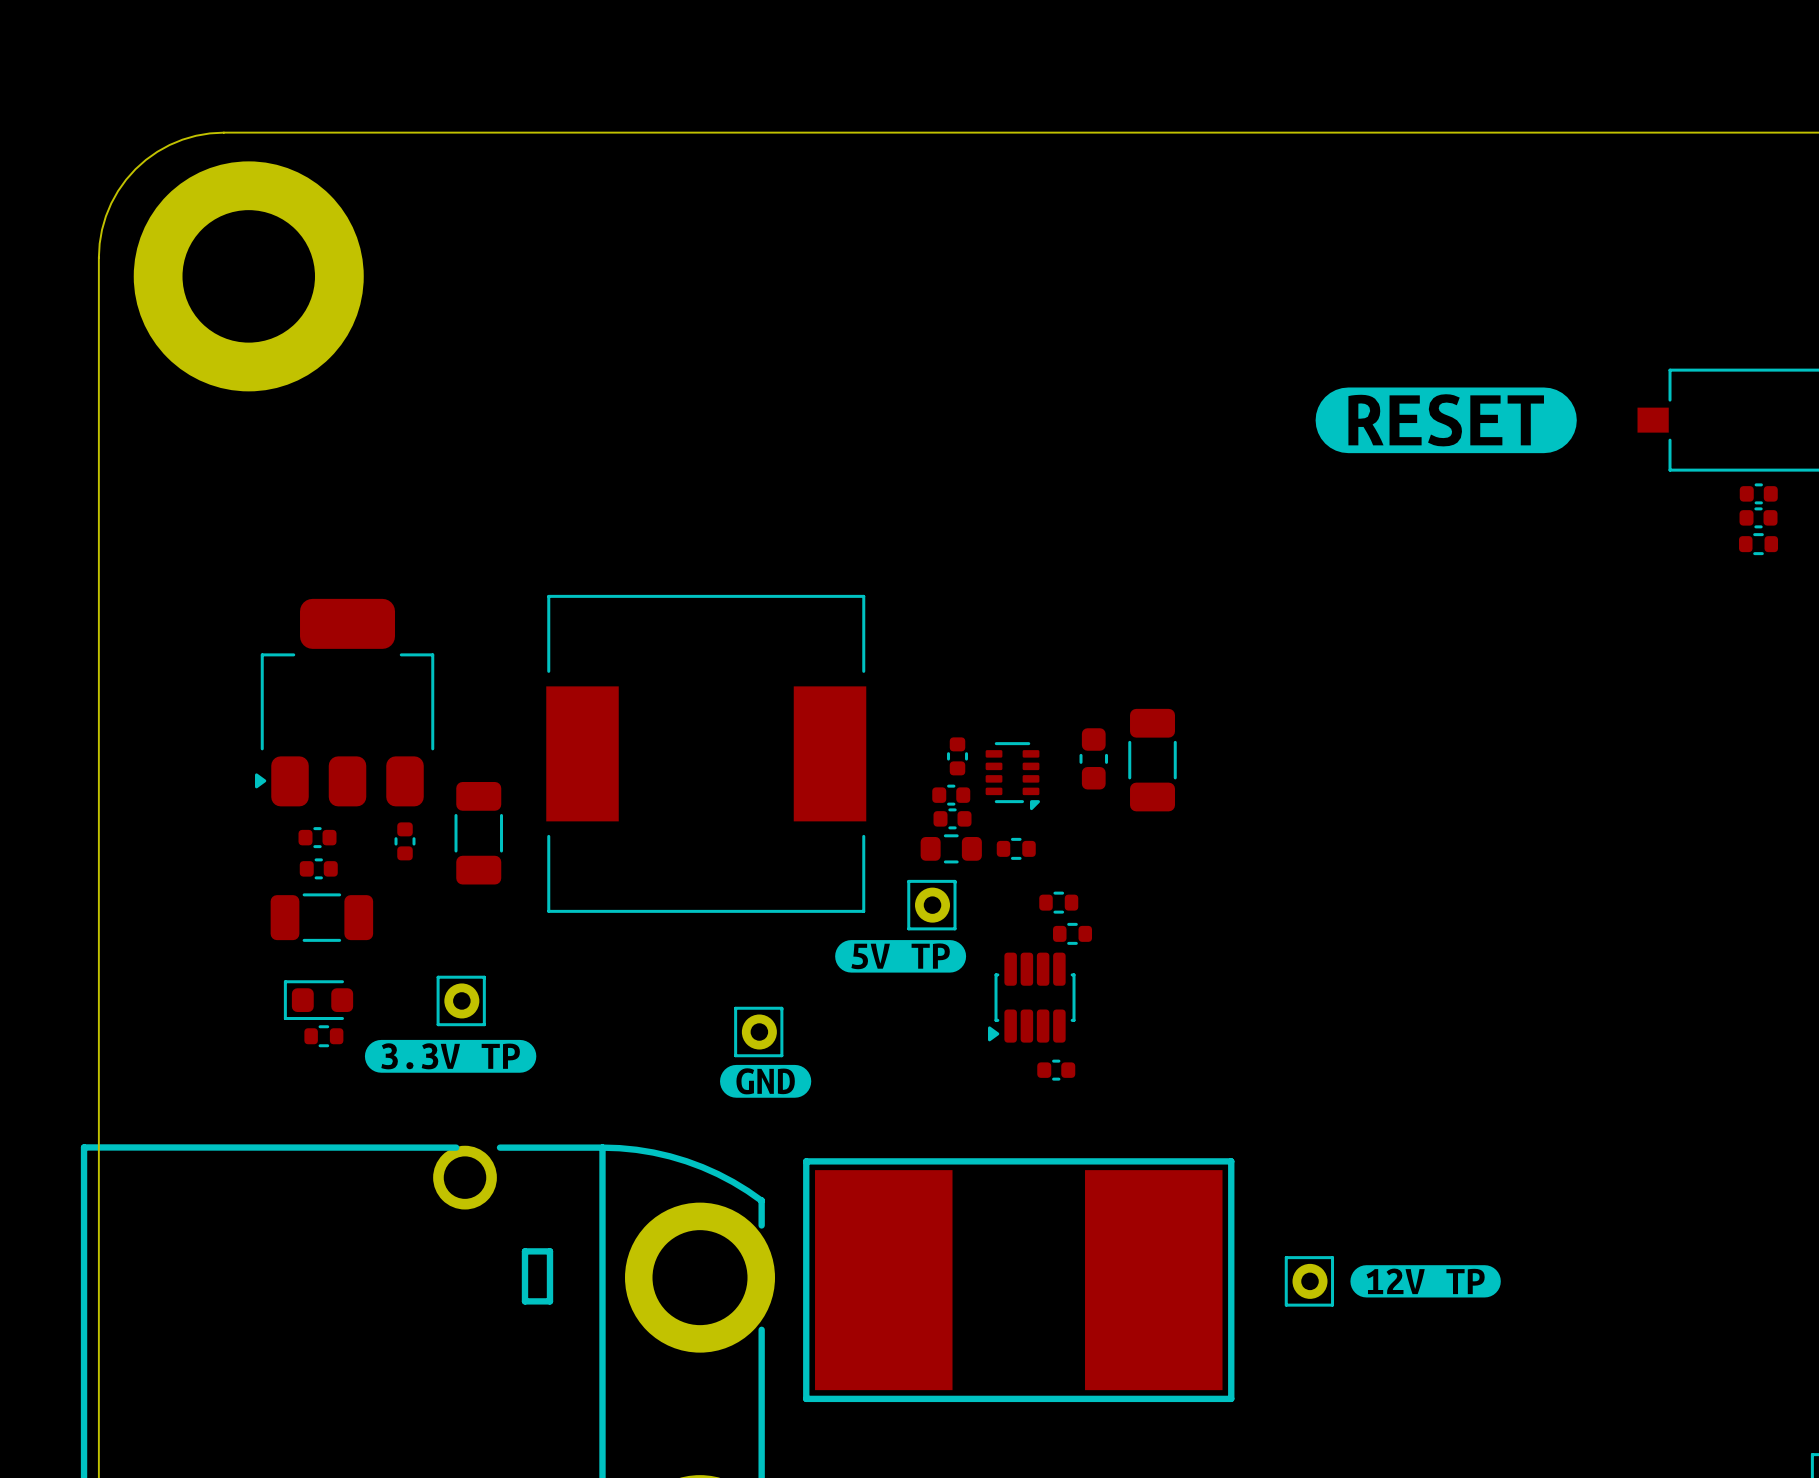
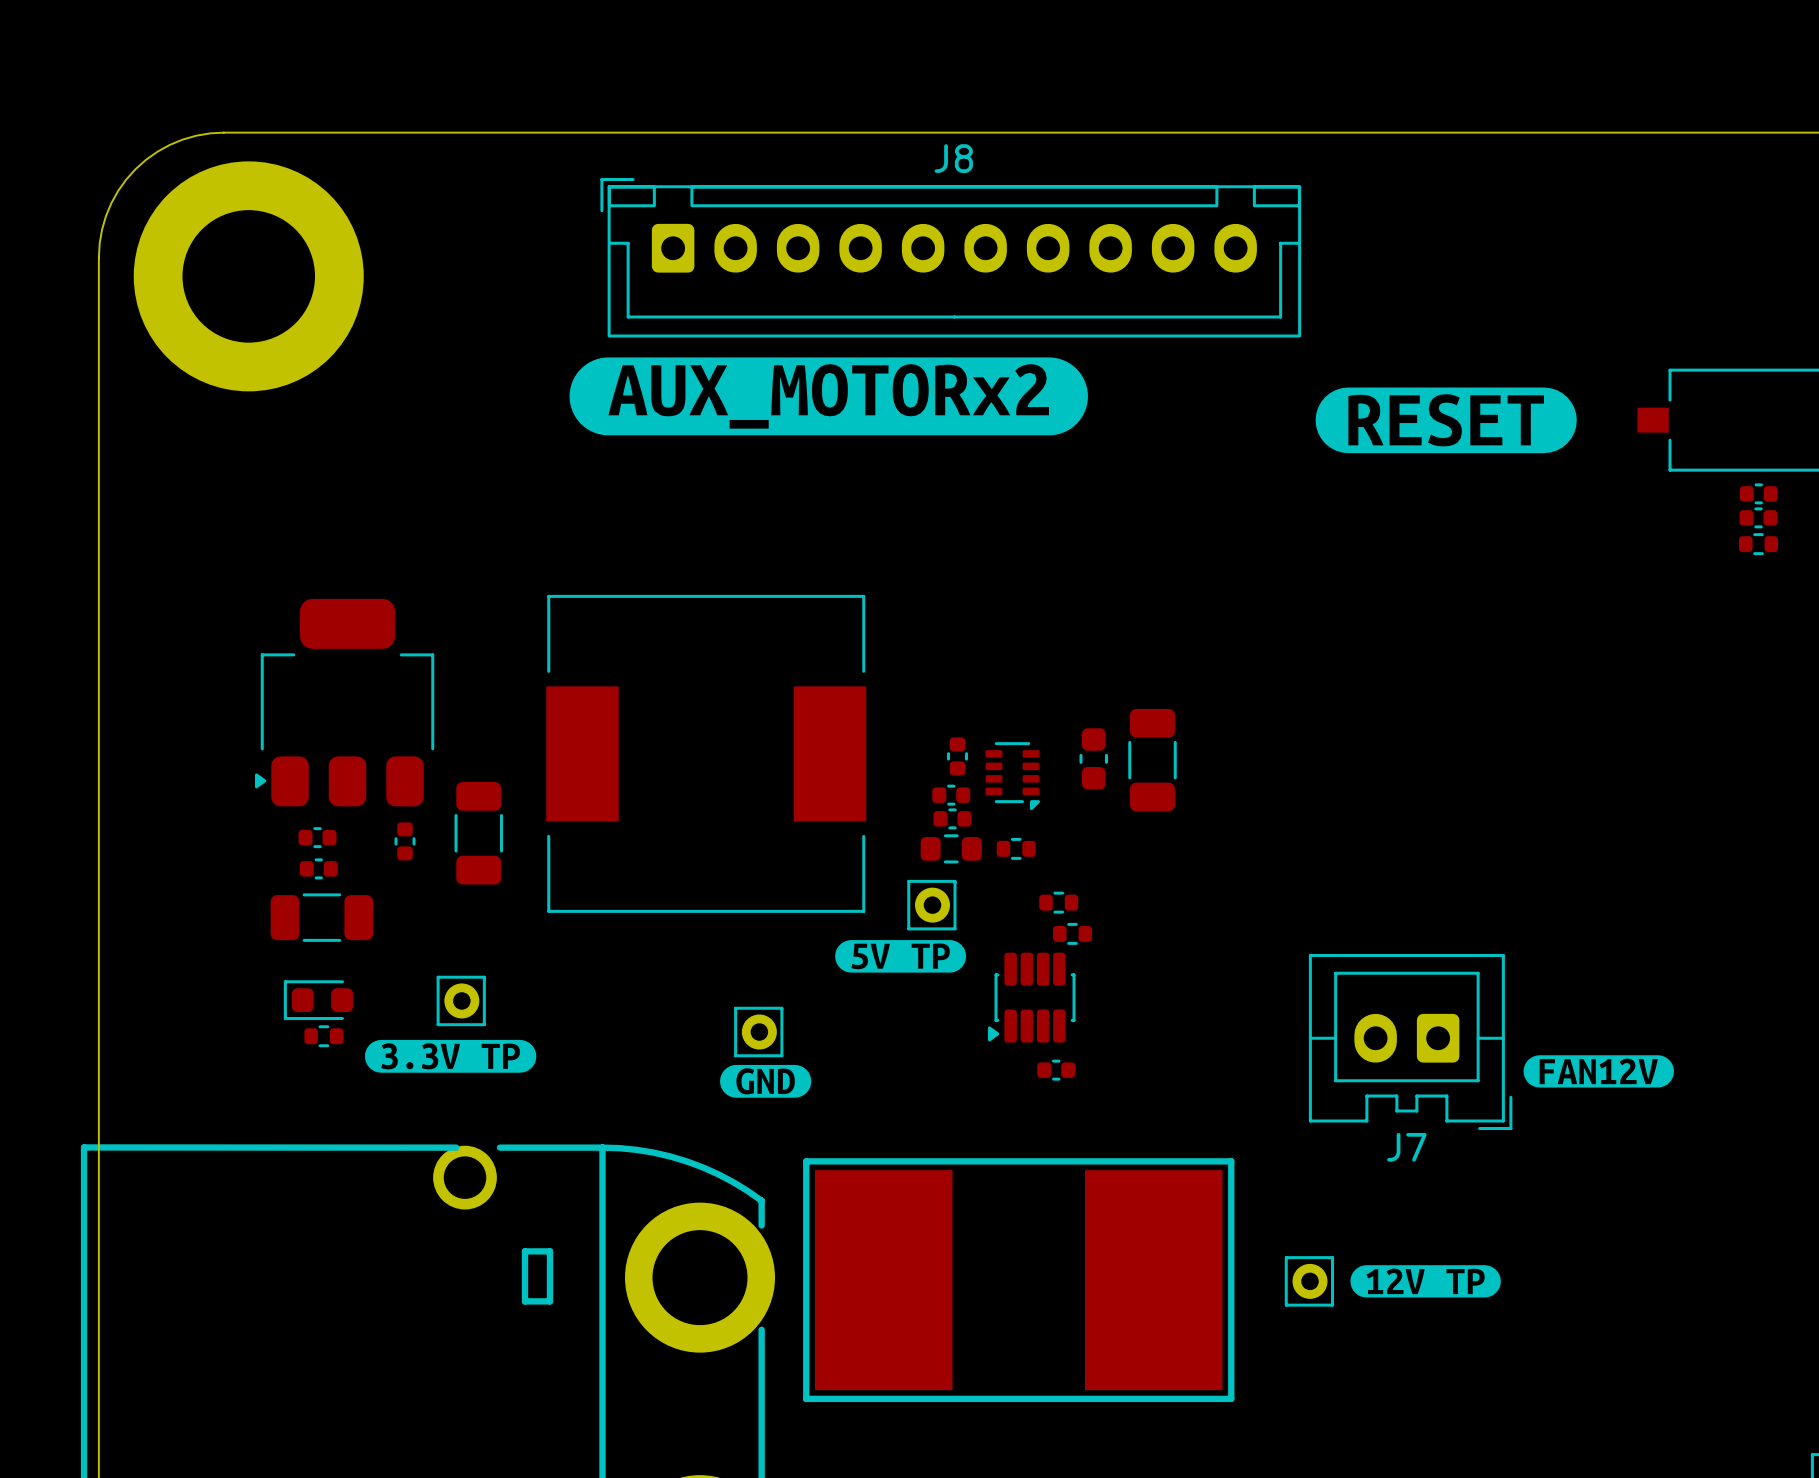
J8: none -> (950, 257)
drawing: none -> [569, 357, 1088, 436]
J7: none -> (1410, 1042)
drawing: none -> [1523, 1055, 1674, 1088]

